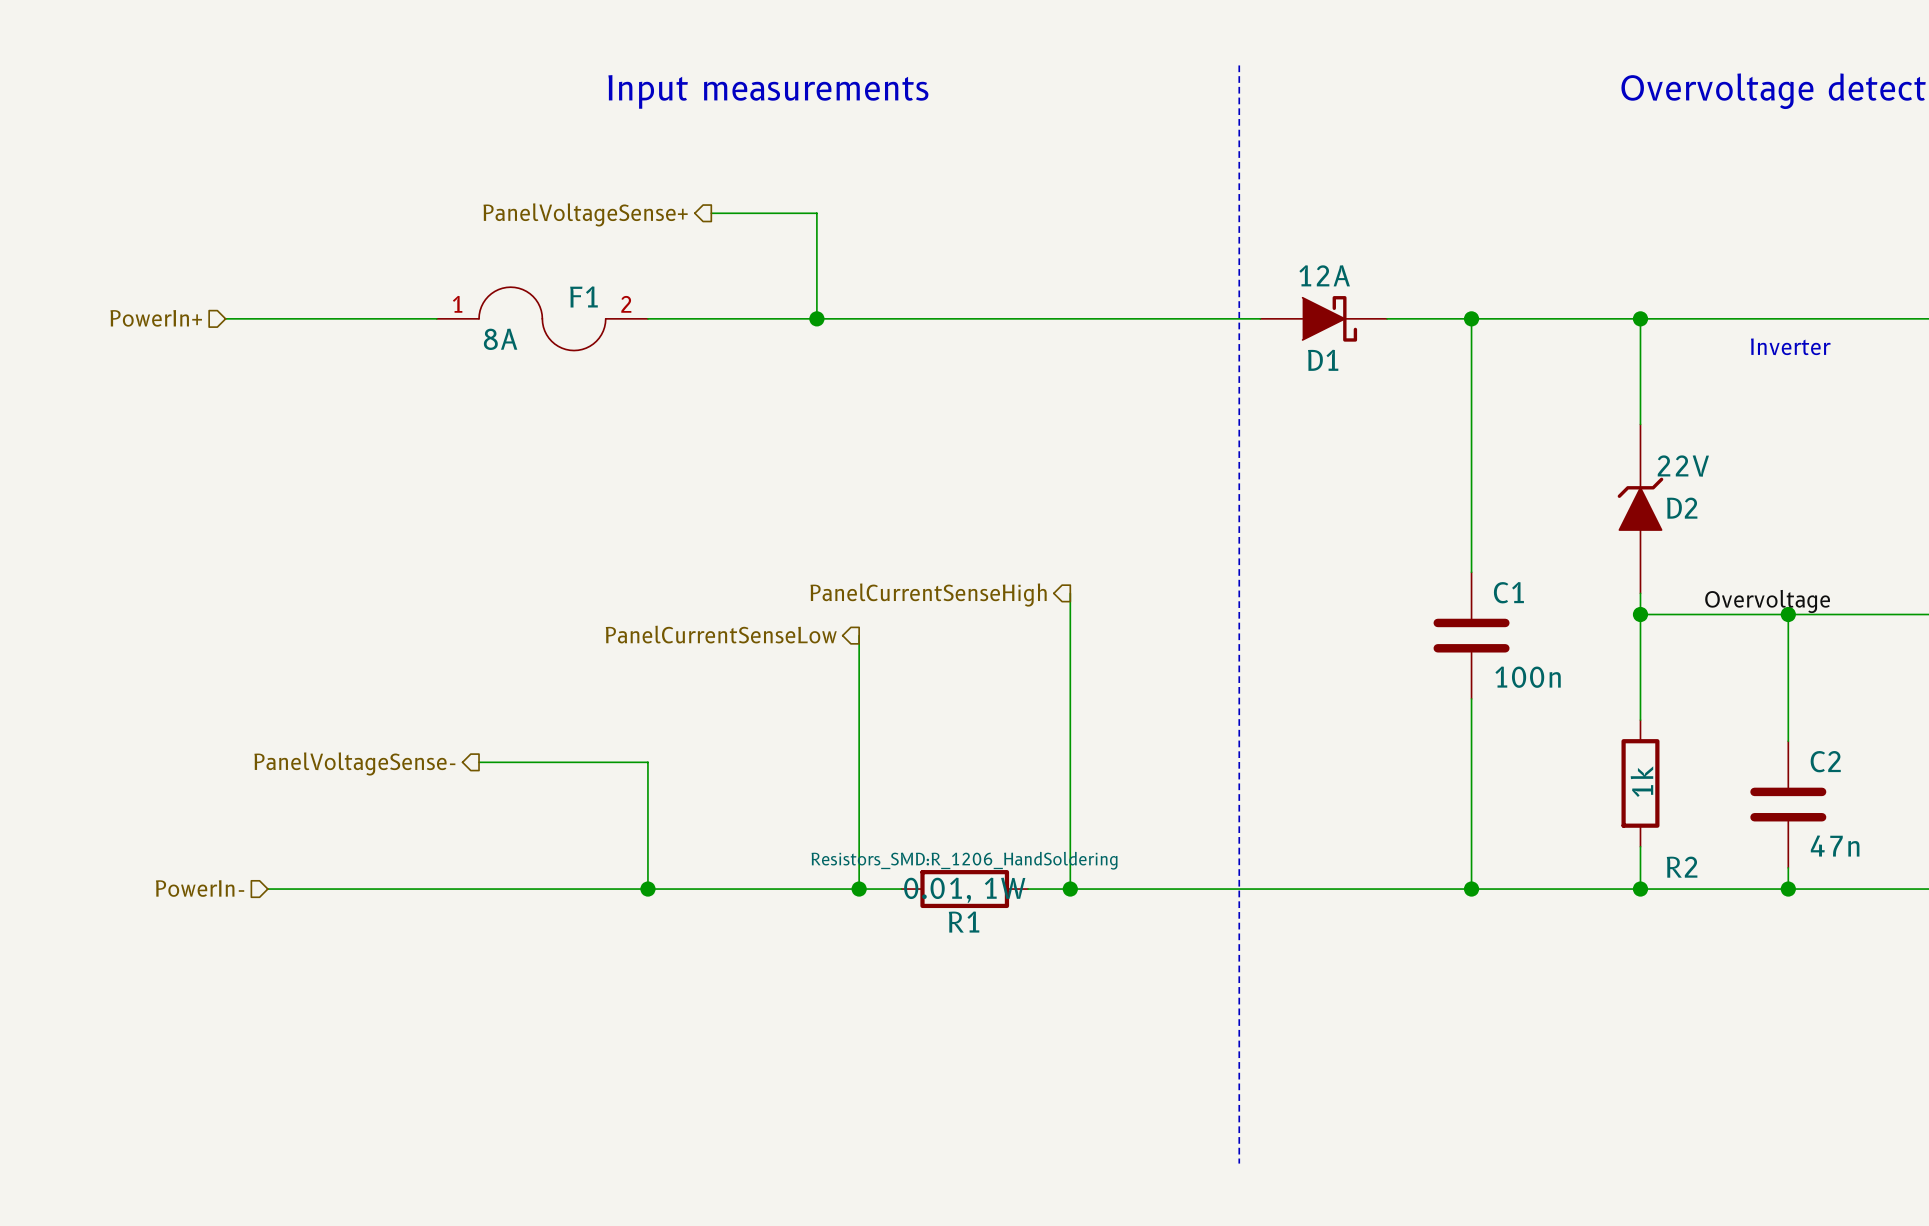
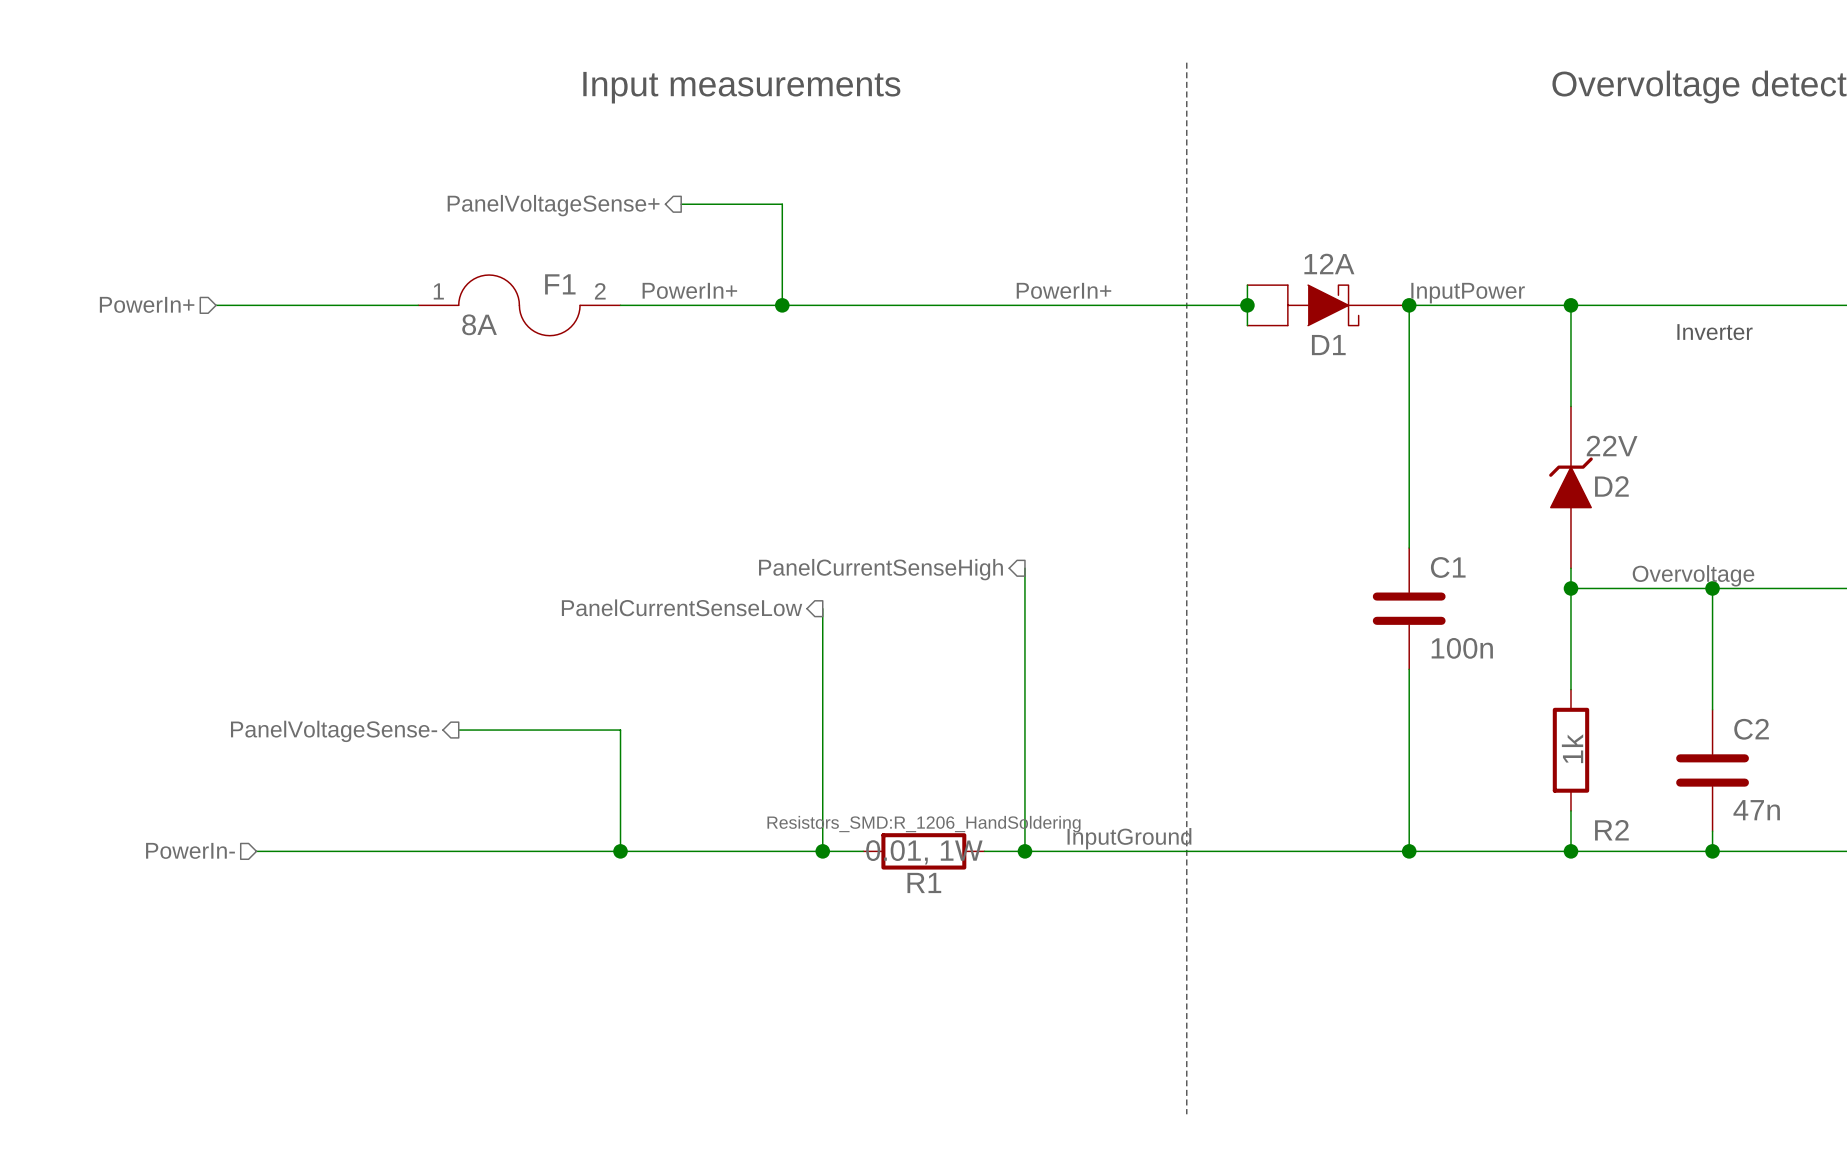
D1 symbol: [1260, 296, 1388, 342] -> [1247, 285, 1410, 326]
label: none -> PowerIn+ (689, 290)
label: none -> PowerIn+ (1063, 290)
label: none -> InputPower (1468, 293)
junction: none -> (1247, 305)
label: none -> InputGround (1129, 838)

